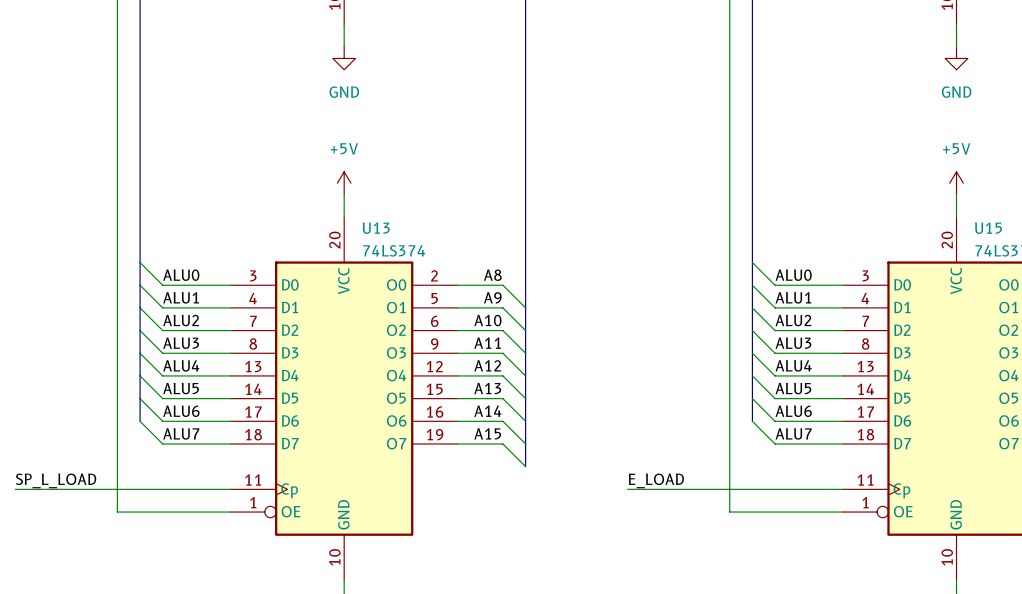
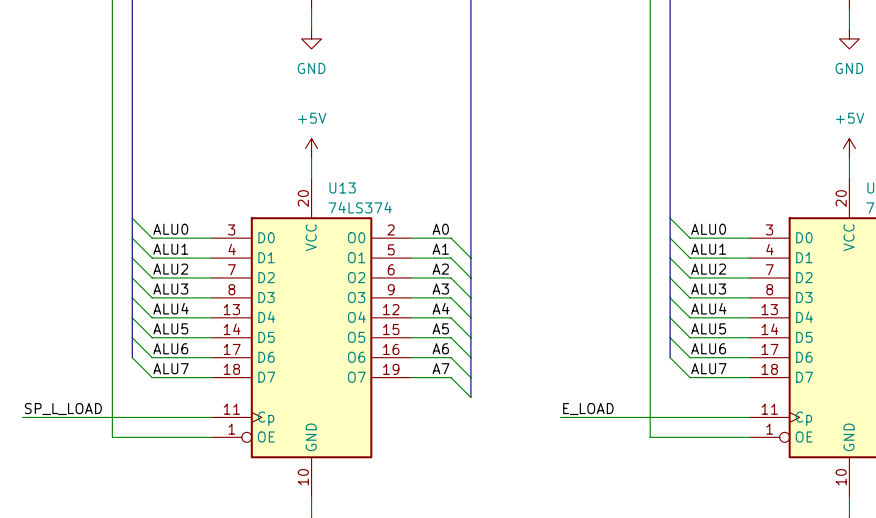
label: A8 (492, 275) -> A0 (440, 229)
label: A9 (492, 297) -> A1 (440, 249)
label: A10 (487, 320) -> A2 (440, 269)
label: A11 (487, 343) -> A3 (440, 289)
label: A12 (487, 365) -> A4 (440, 308)
label: A13 (487, 388) -> A5 (440, 328)
label: A14 (487, 411) -> A6 (440, 348)
label: A15 (487, 433) -> A7 (440, 368)

